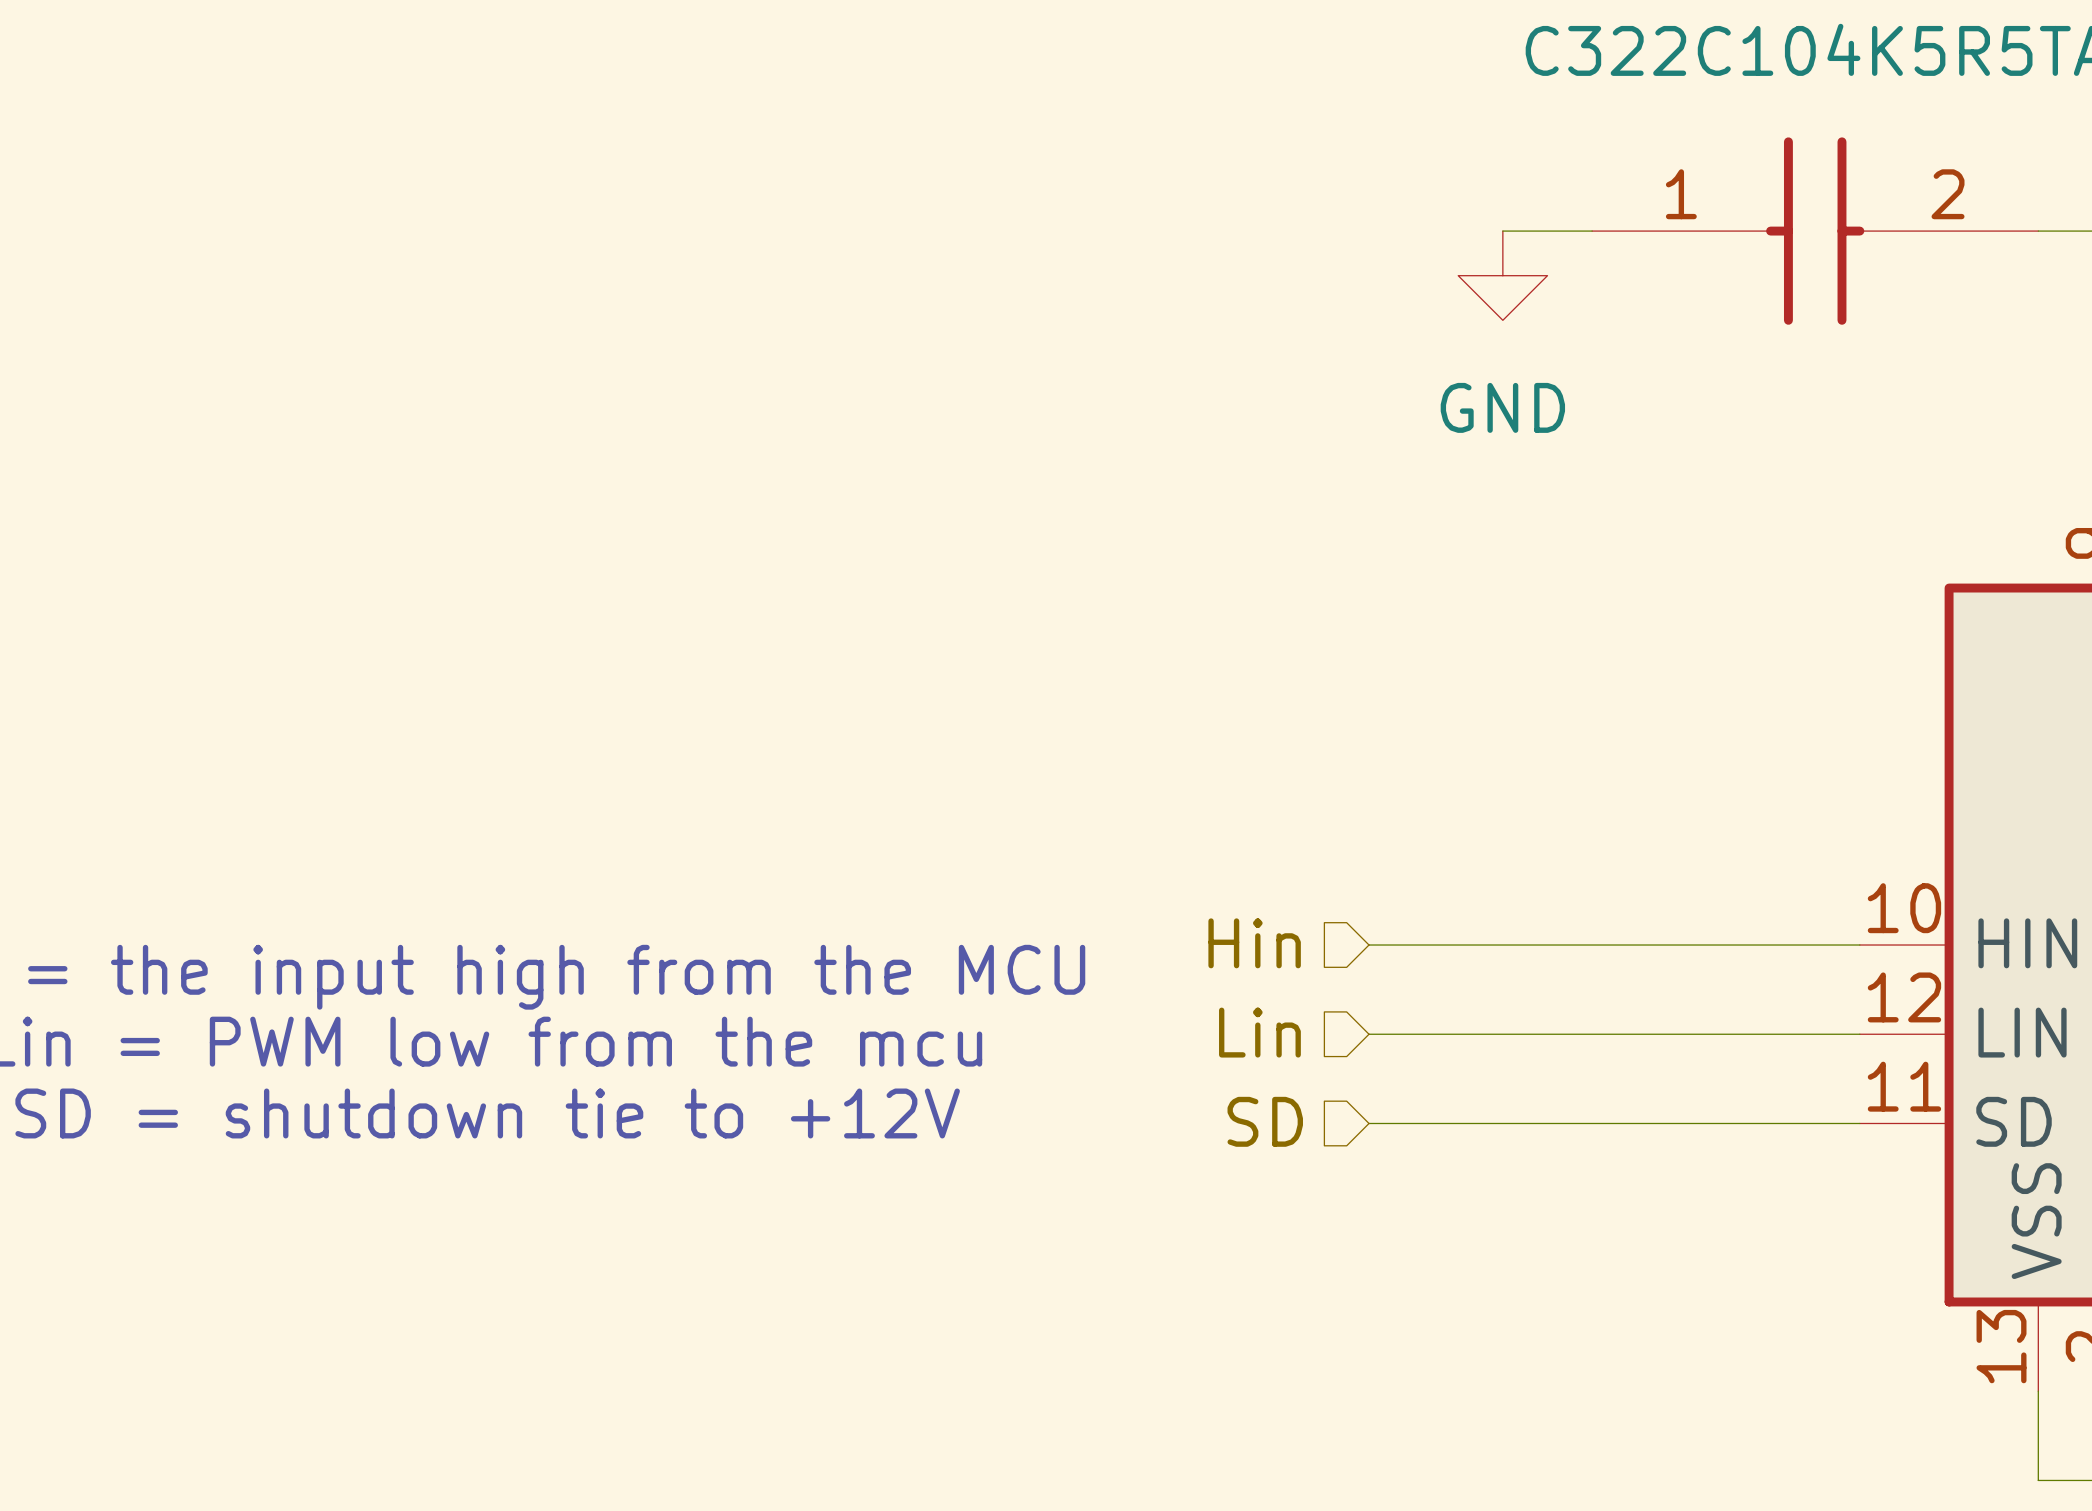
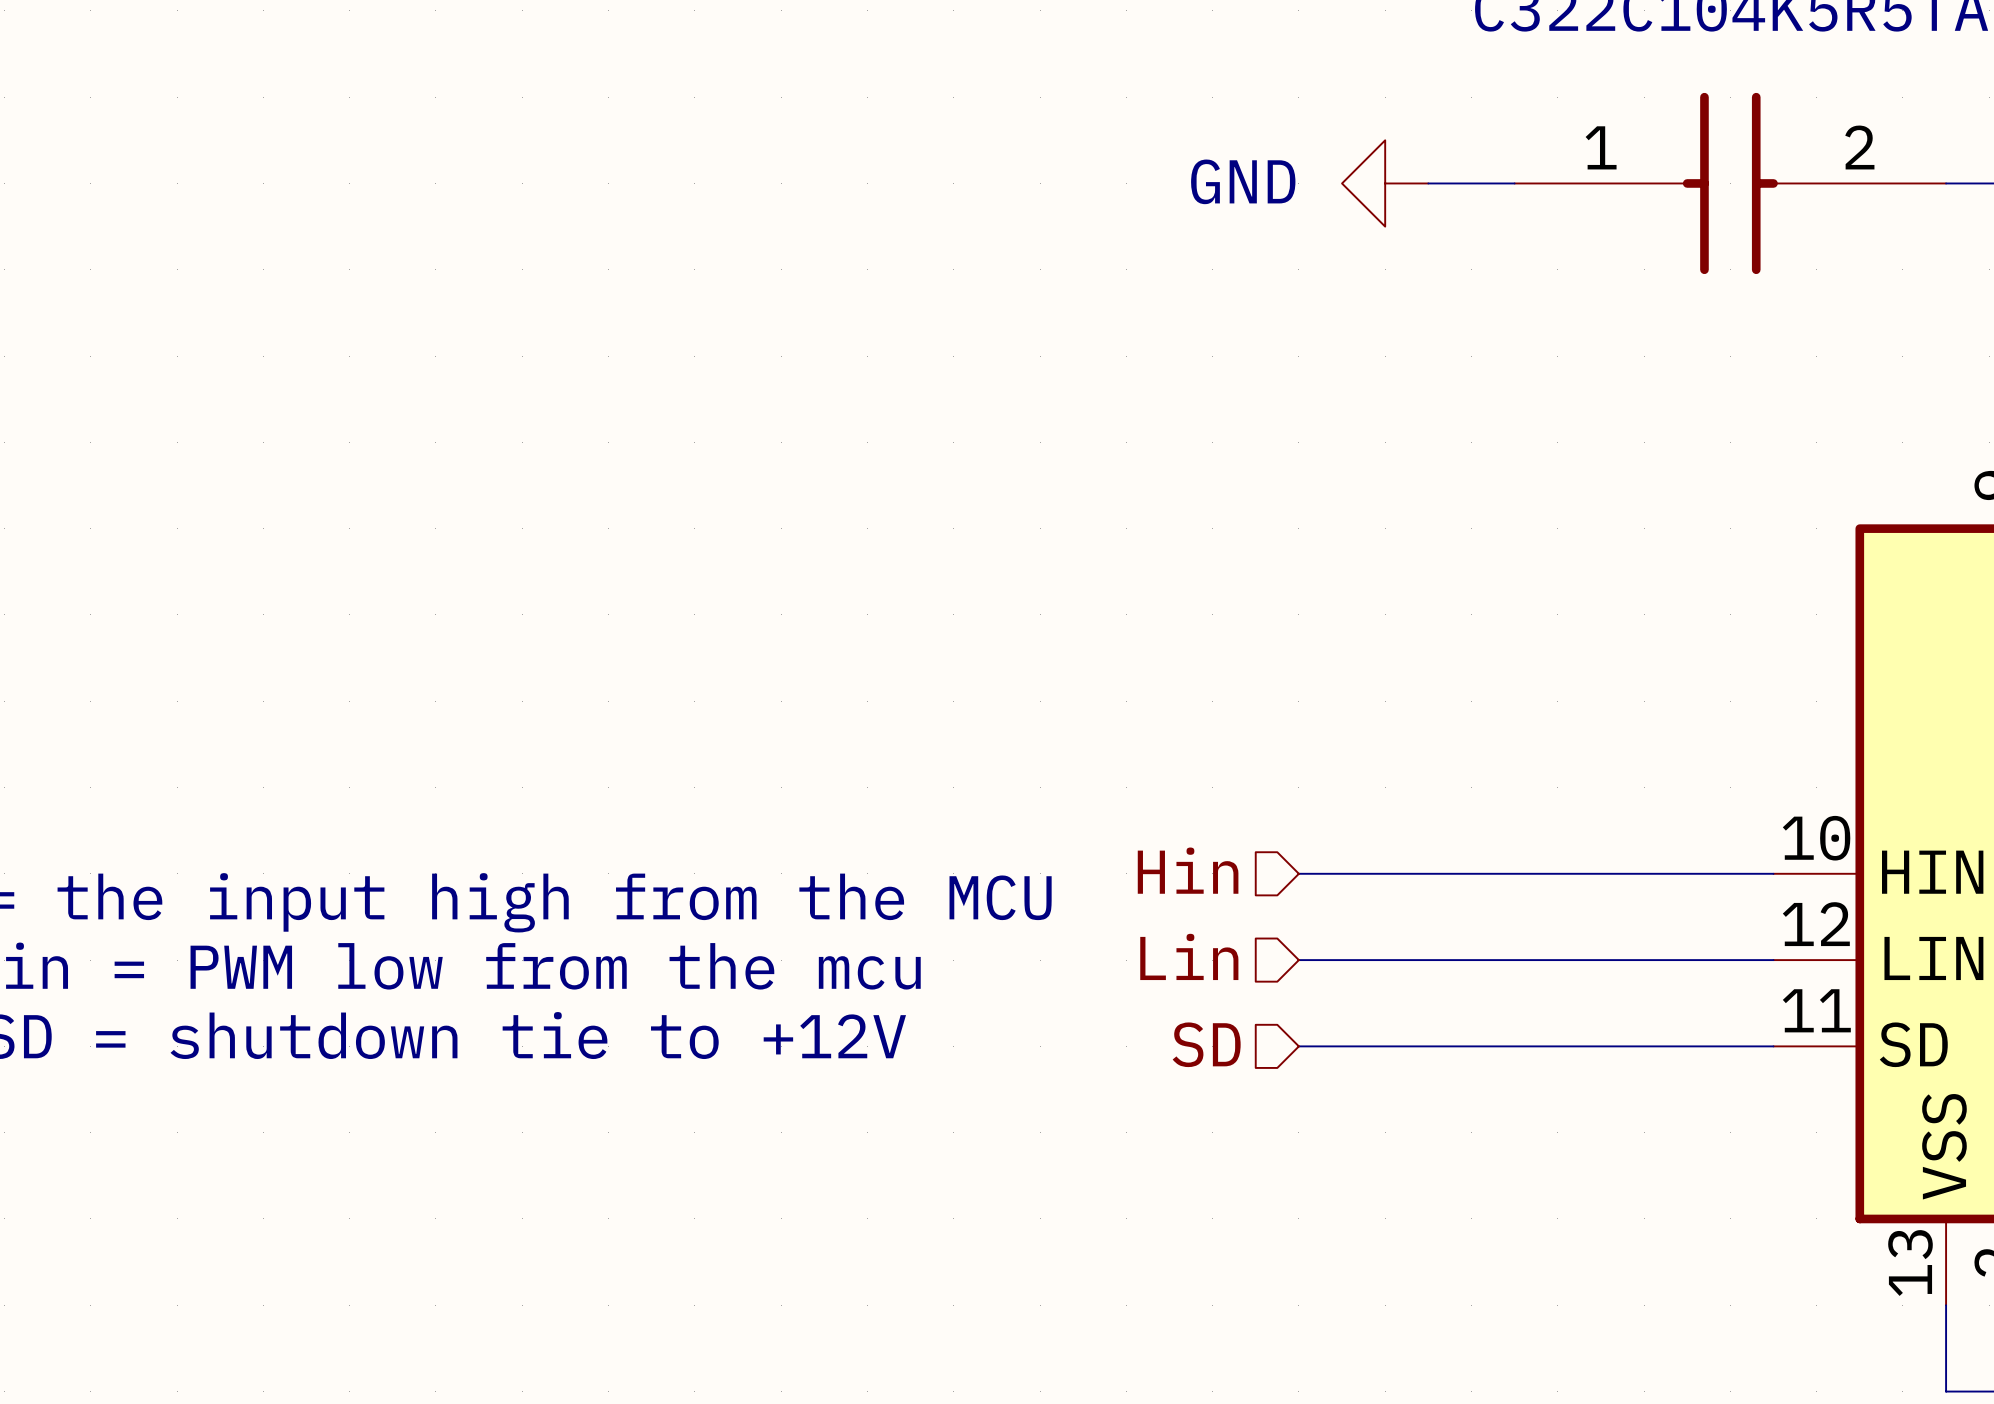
power symbol rotation: 0° (1502, 275) -> 90° clockwise (1385, 183)
power symbol position: GND (1502, 275) -> GND (1385, 183)

